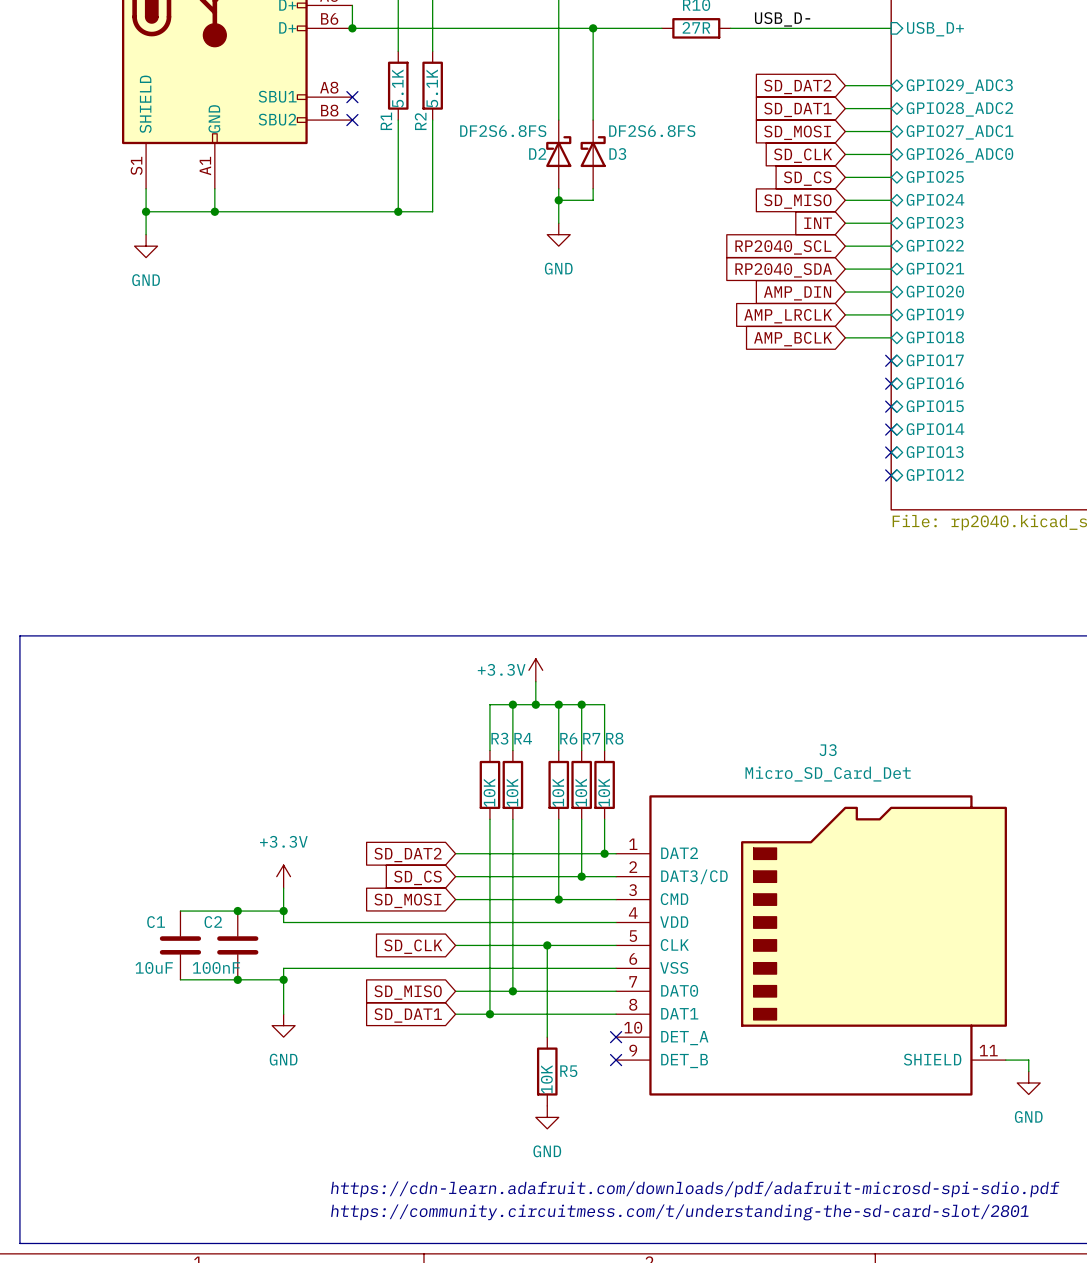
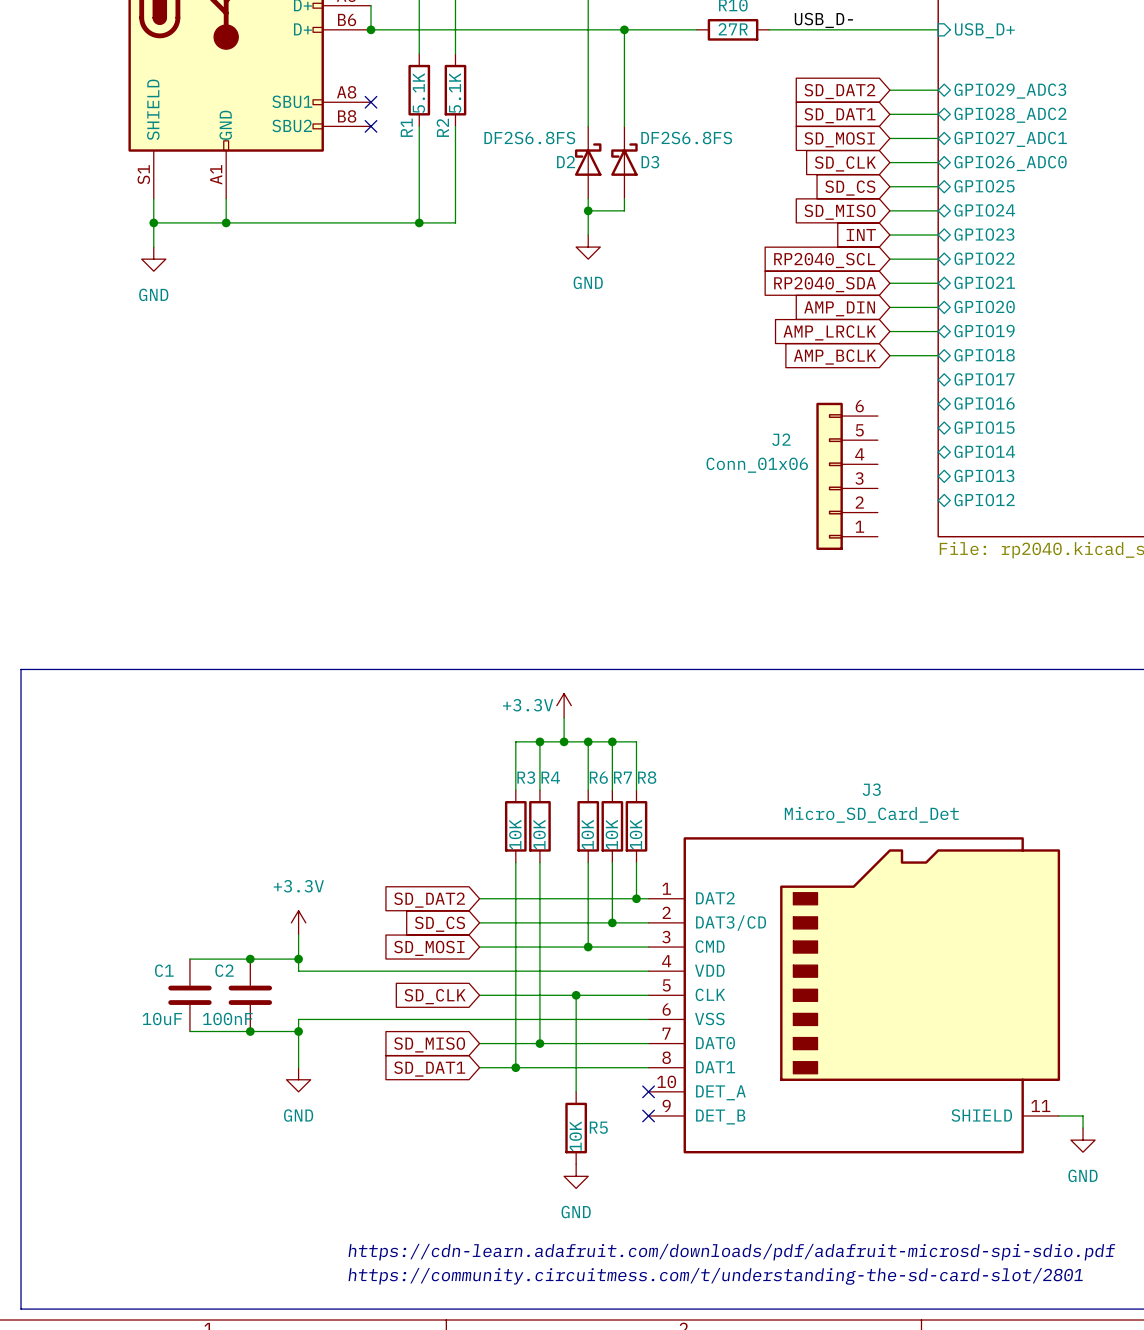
no-connect mark: (891, 360) -> none
no-connect mark: (891, 383) -> none
no-connect mark: (891, 406) -> none
no-connect mark: (891, 429) -> none
J2: none -> Conn_01x06 (847, 476)
no-connect mark: (891, 452) -> none
no-connect mark: (891, 475) -> none

